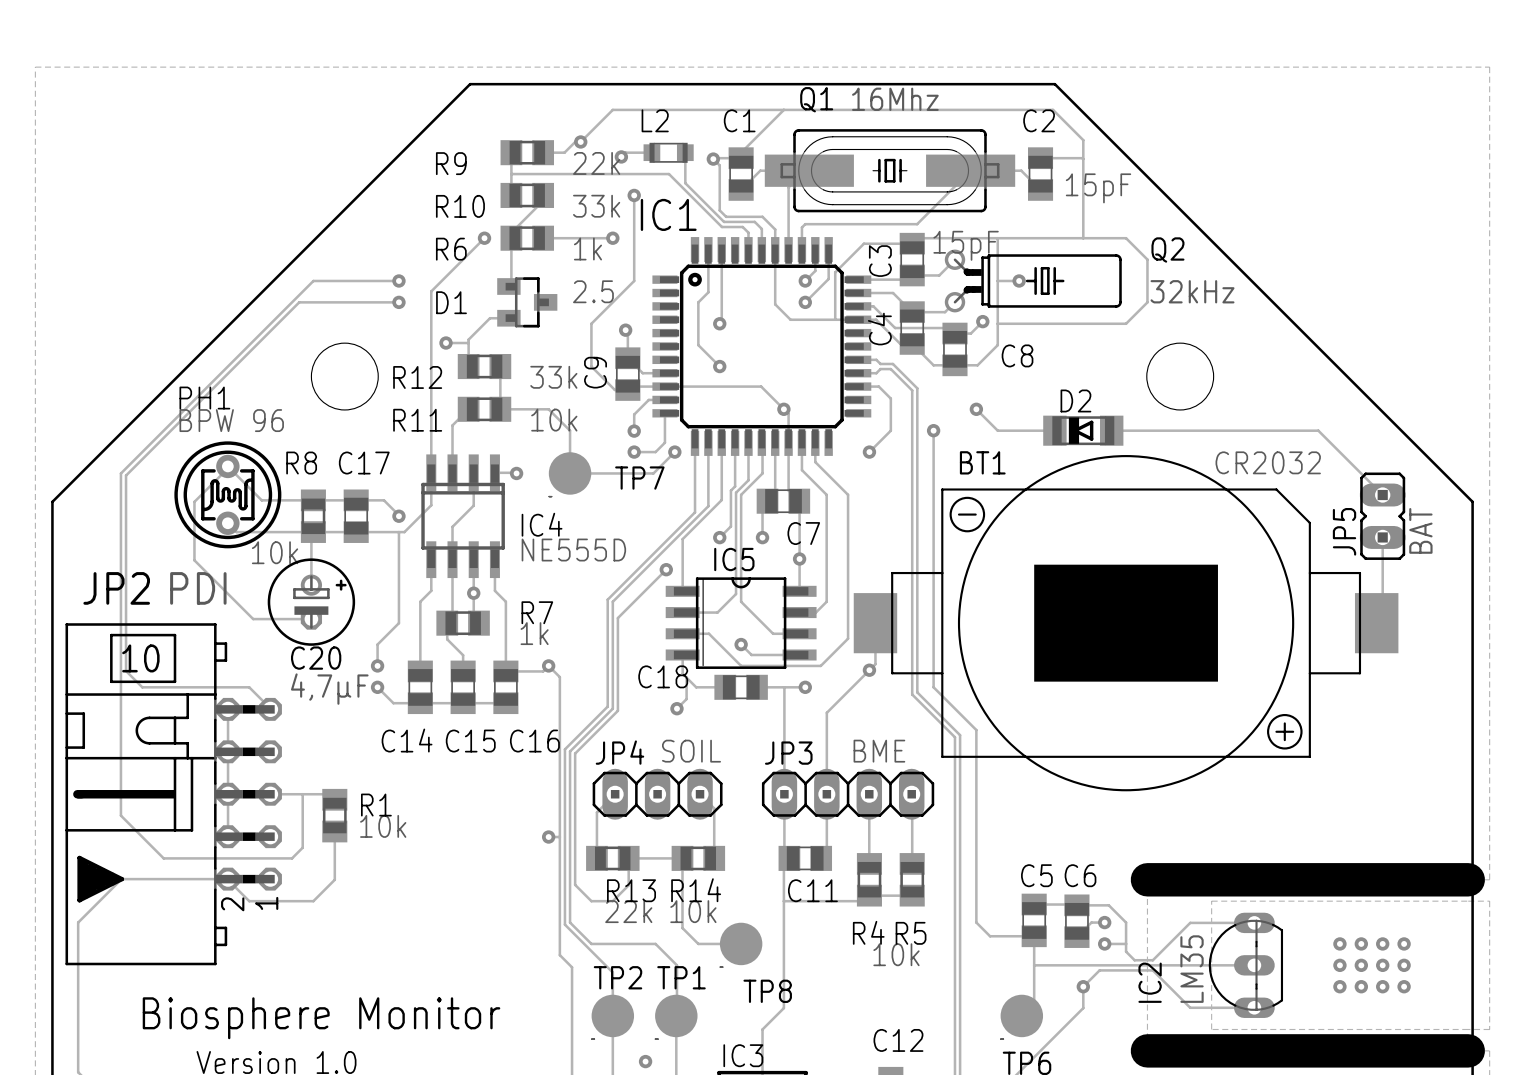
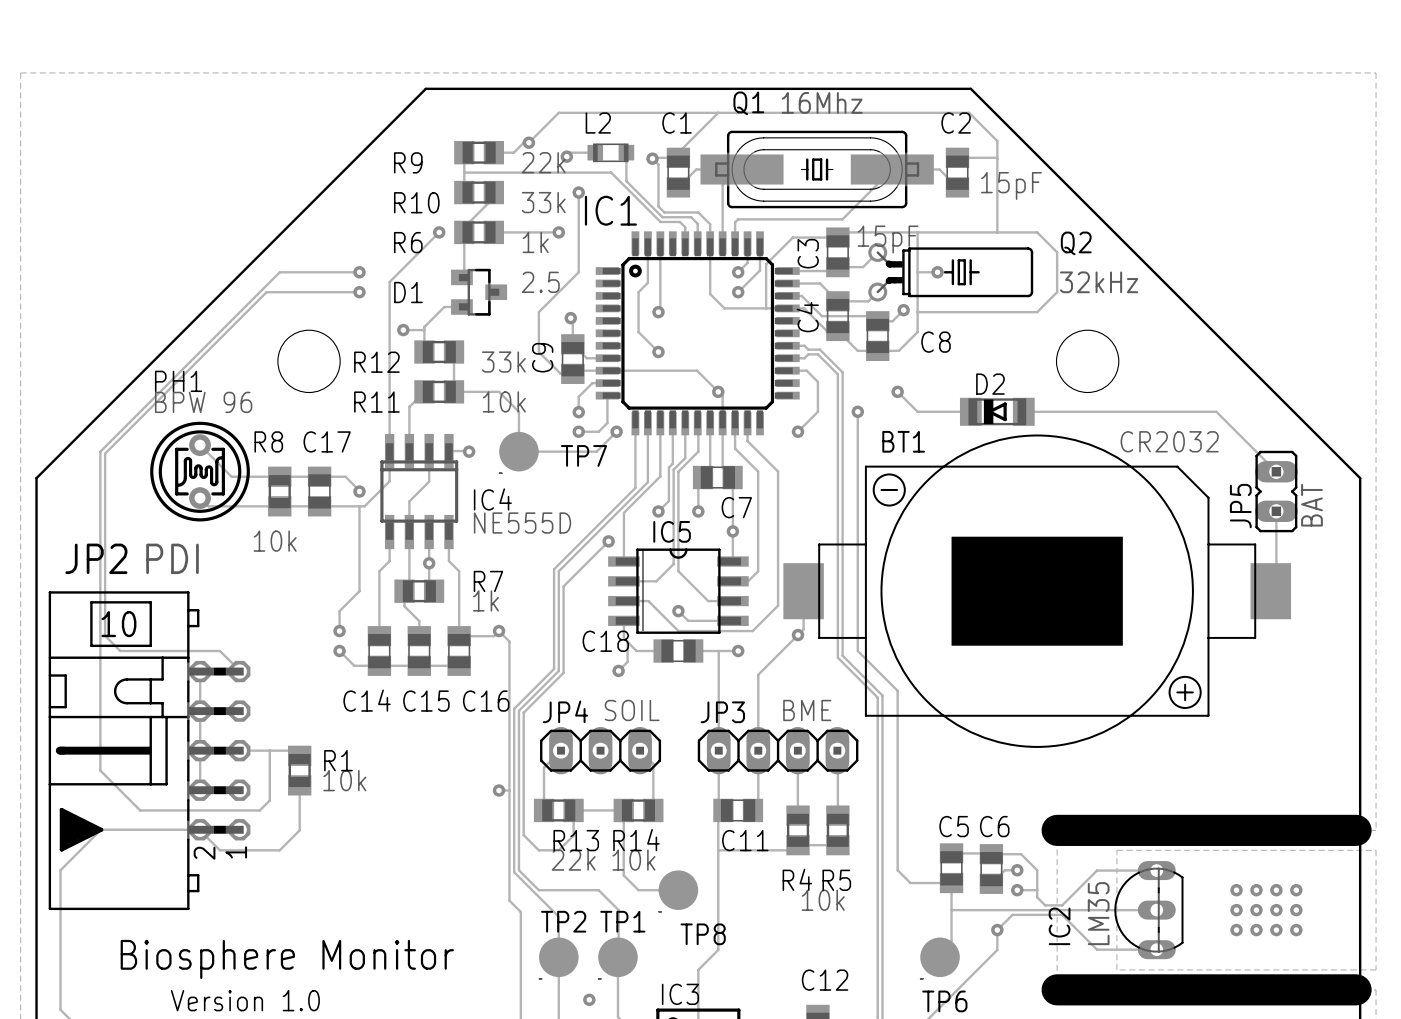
track: (228, 467) (194, 501) (194, 560) (253, 619) (311, 619) -> none
track: (311, 532) (311, 585) -> none
R8 value position: 10k (275, 552) -> 10k (275, 541)
C20: 4,7µF (311, 602) -> none

